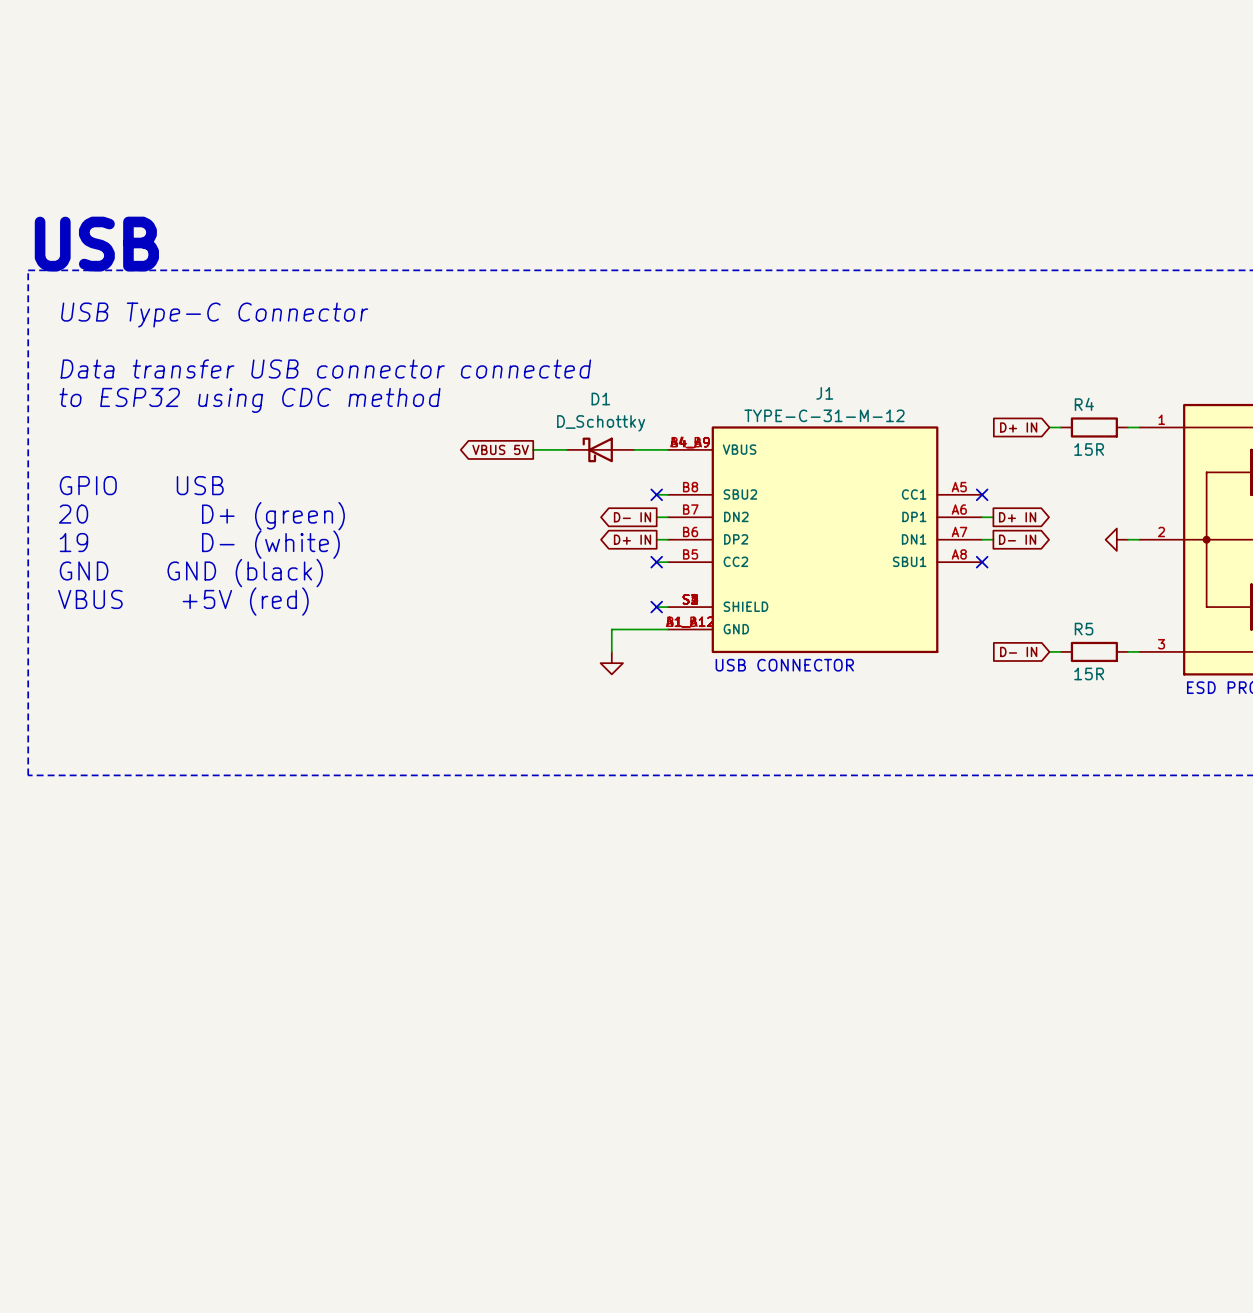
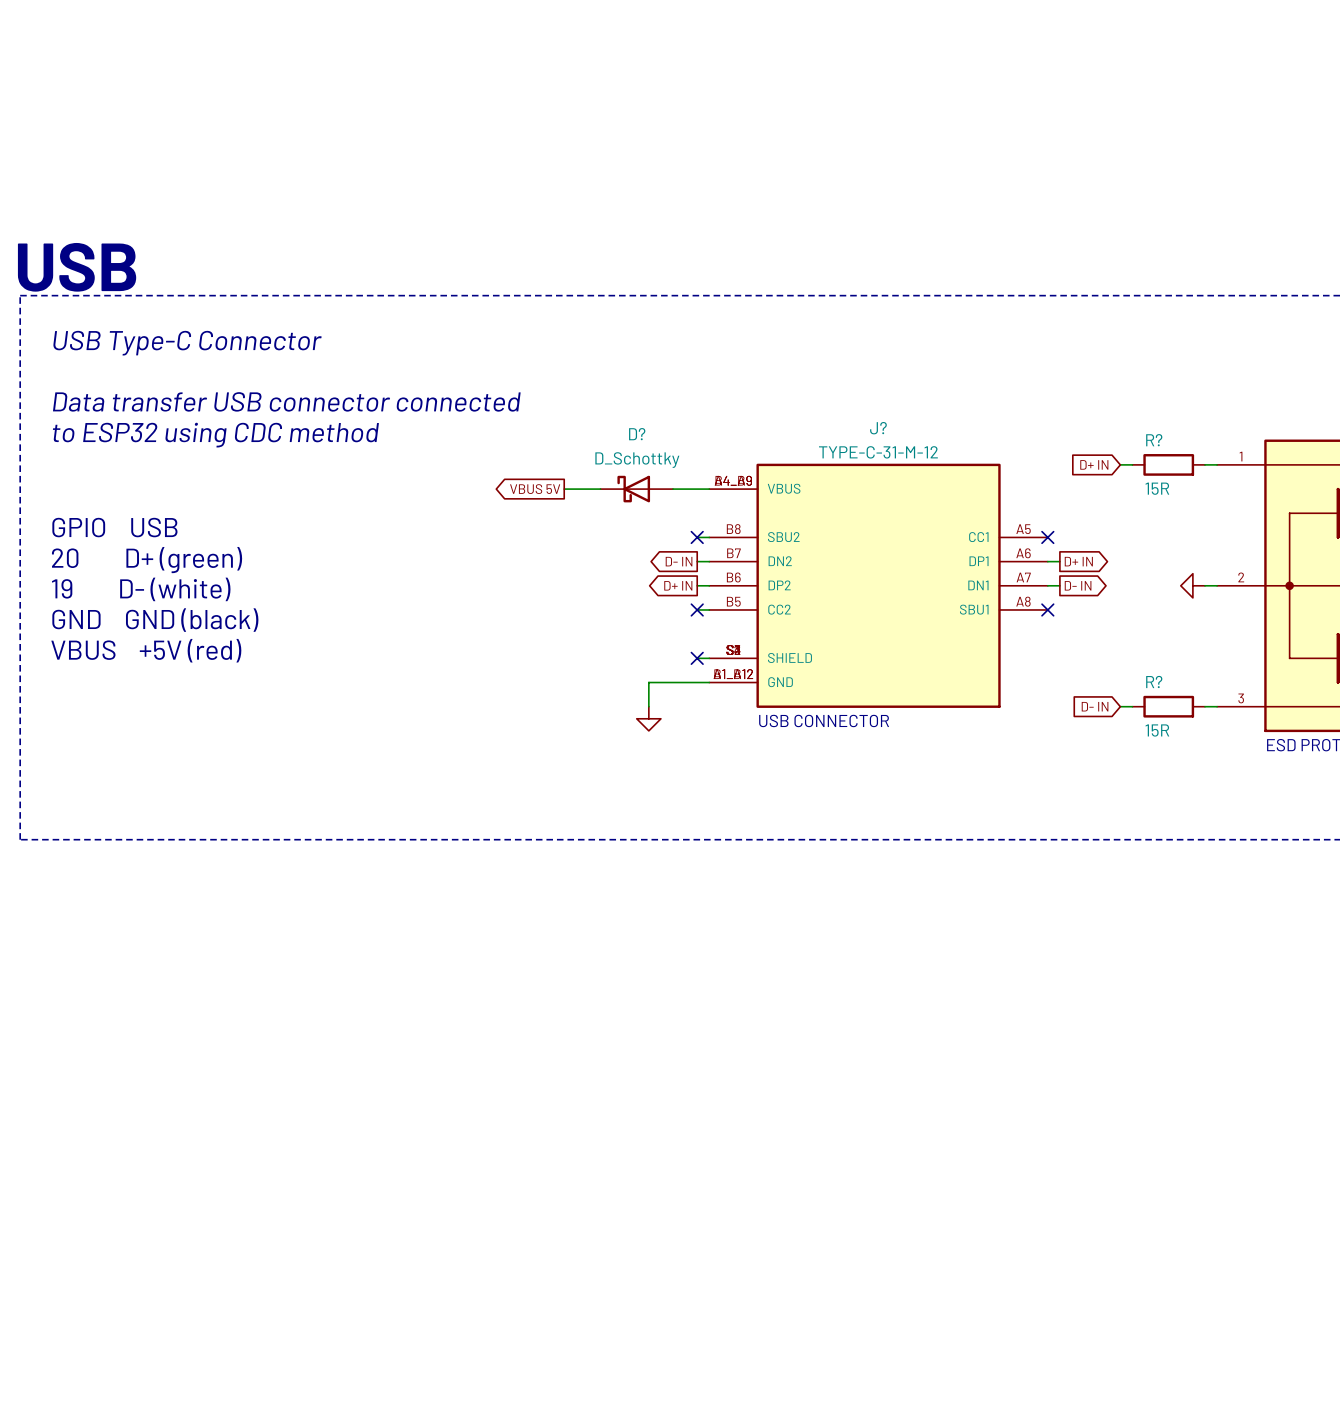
J1 name: J1 (824, 393) -> J? (878, 428)
D1 name: D1 (600, 399) -> D? (637, 434)
R4 name: R4 (1084, 404) -> R? (1154, 440)
R5 name: R5 (1084, 629) -> R? (1154, 681)

